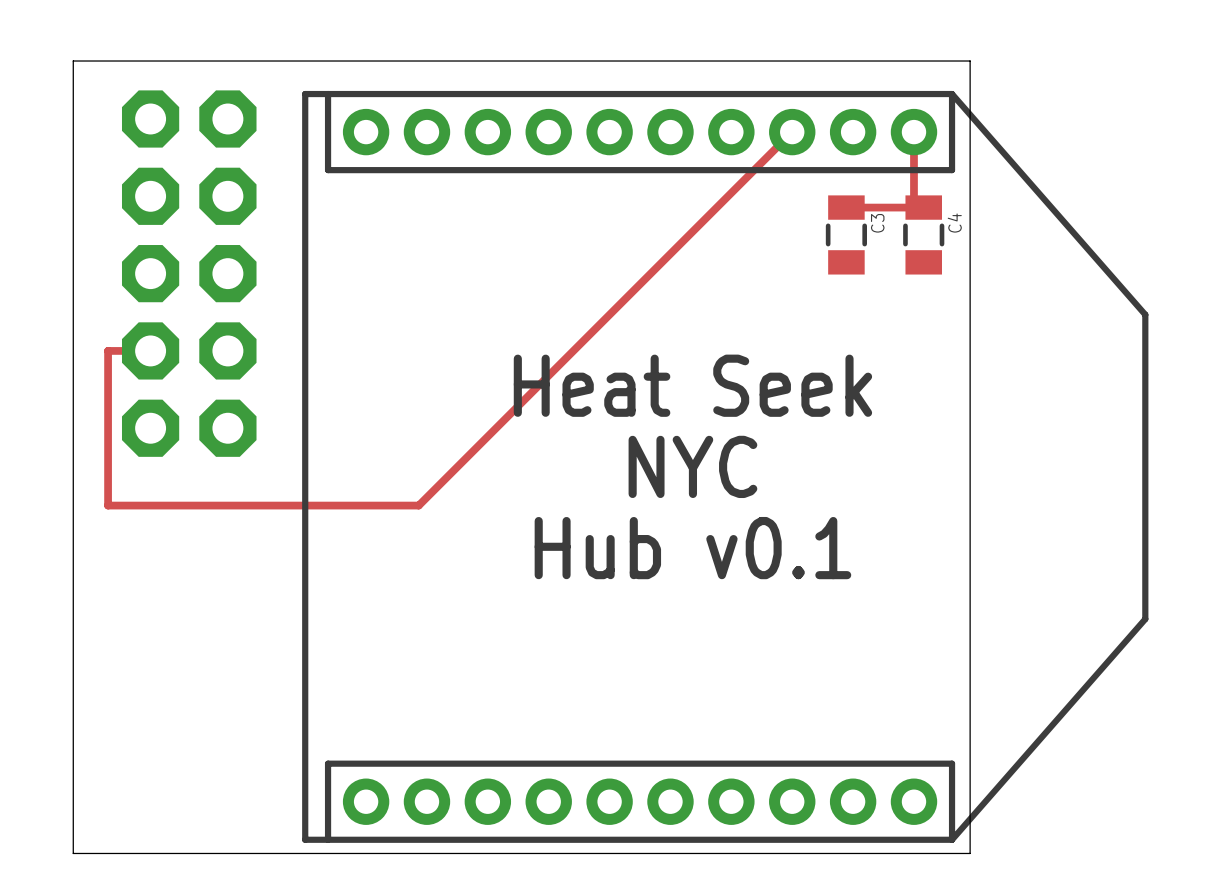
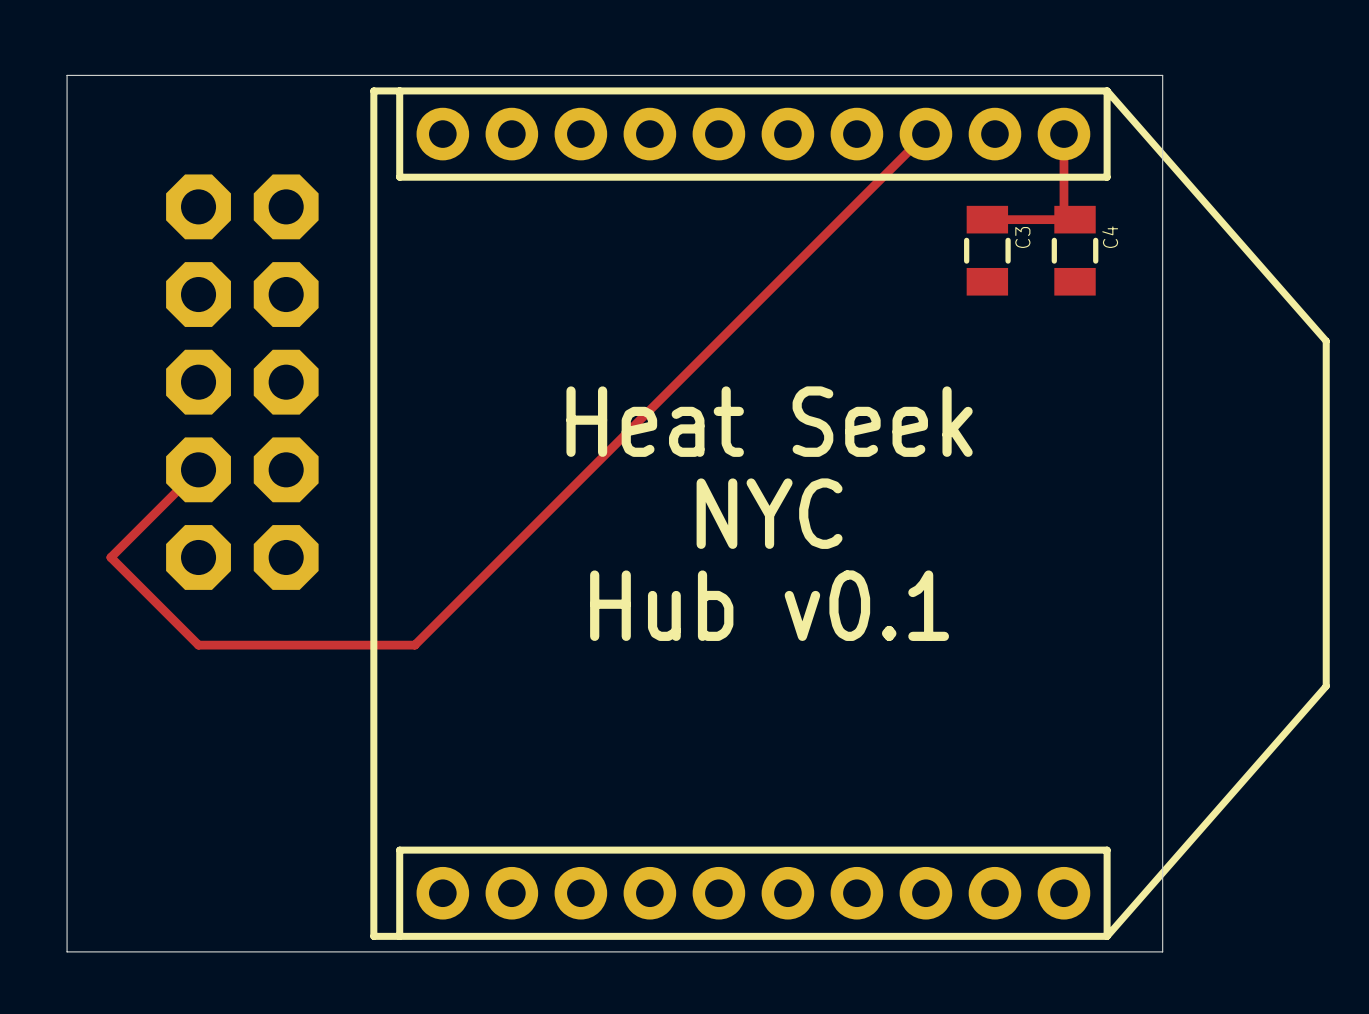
part position: (189, 273) -> (242, 382)
track: (150, 350) (108, 350) (108, 505) (418, 505) -> (198, 469) (110, 557) (198, 645) (414, 645) (502, 557)
text position: Heat Seek (692, 385) -> Heat Seek (769, 421)
text position: NYC (692, 466) -> NYC (769, 513)
text position: Hub v0.1 (692, 548) -> Hub v0.1 (769, 605)
board edge: (73, 853) (73, 61) (970, 61) (970, 853) -> (110, 951) (67, 951) (67, 75) (1162, 75) (1162, 951) (1127, 951)

